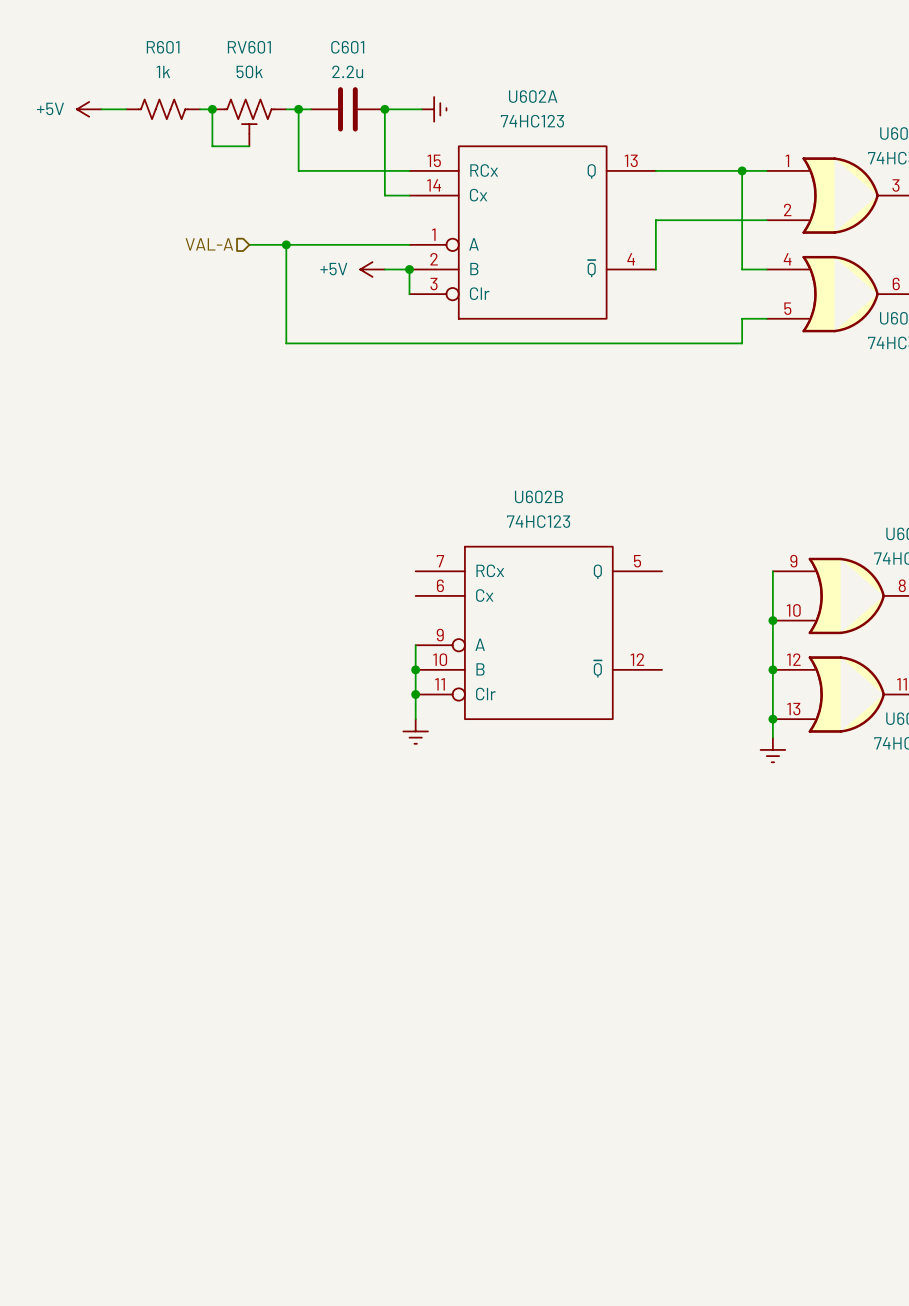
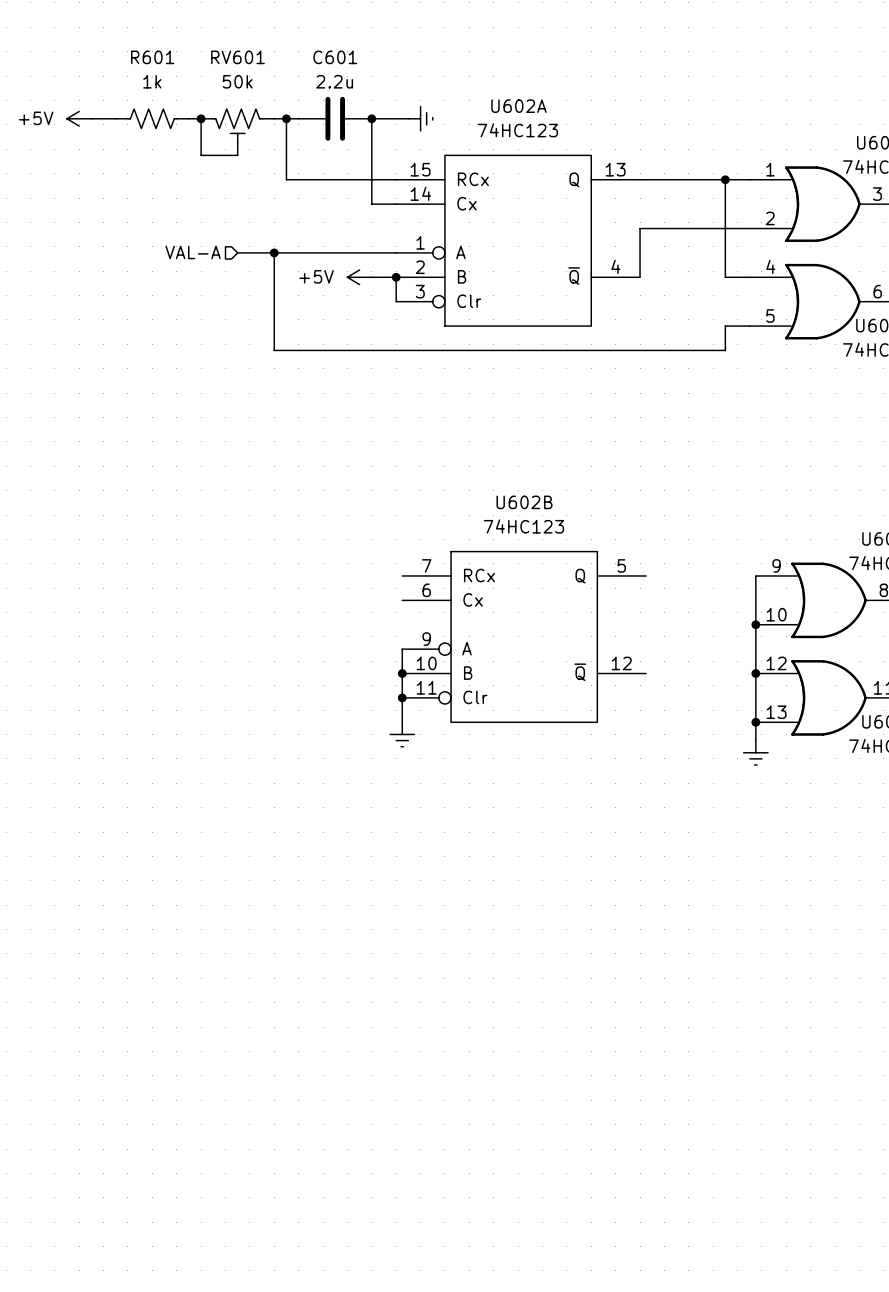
RV601 flip: as is (249, 116) -> left-right (237, 126)

